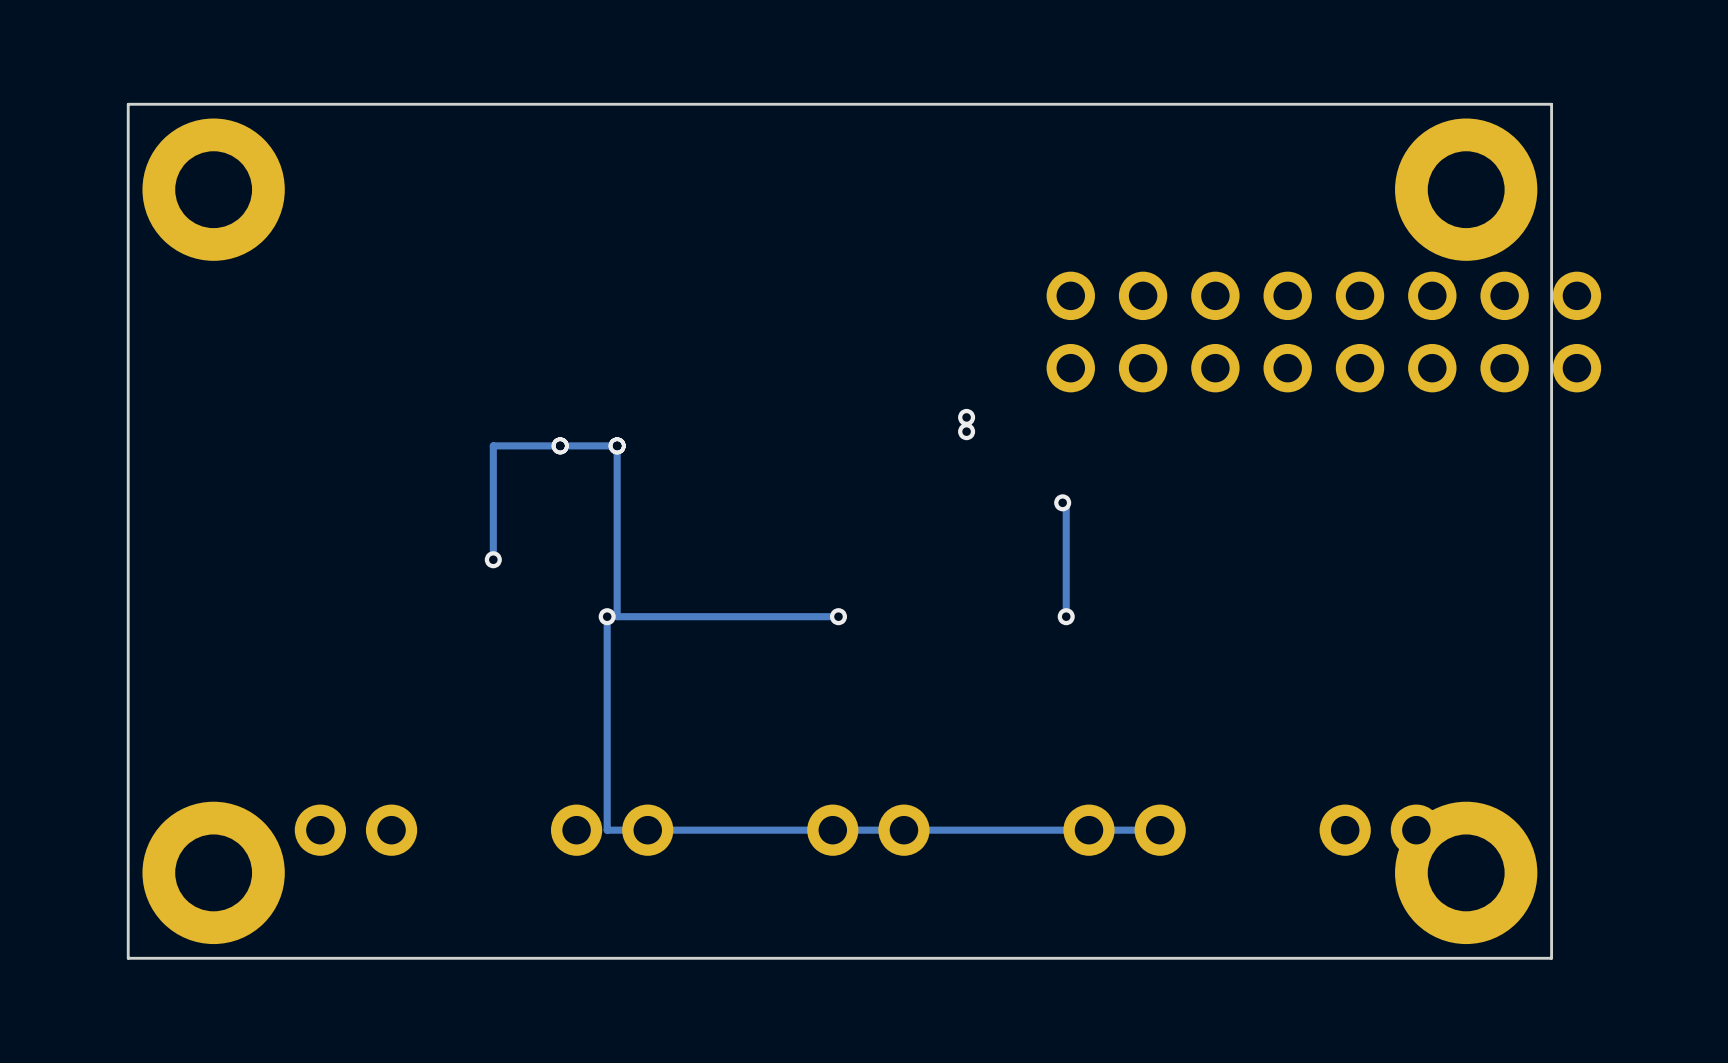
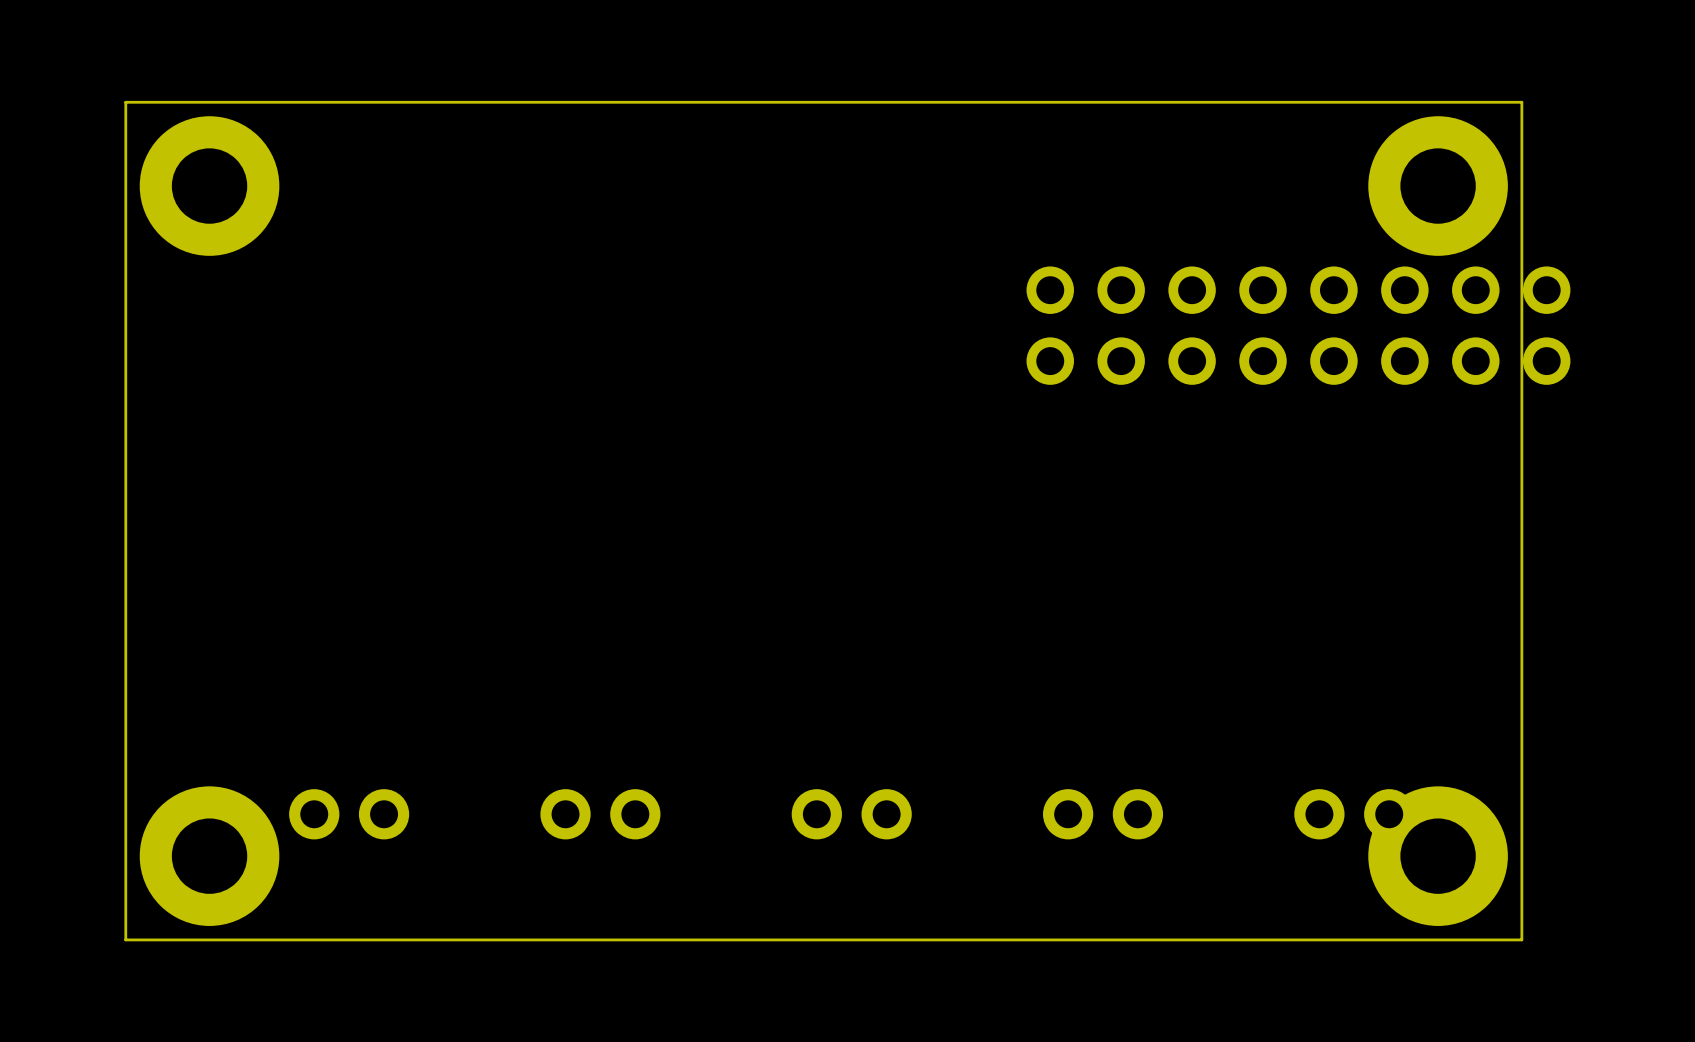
via: (966, 417) -> none
via: (966, 431) -> none
via: (560, 445) -> none
via: (617, 445) -> none
track: (1062, 502) (1066, 502) (1066, 616) -> none
via: (1062, 502) -> none
track: (493, 559) (493, 445) (617, 445) (617, 616) (838, 616) -> none
via: (493, 559) -> none
track: (607, 616) (607, 830) (1160, 830) -> none
via: (607, 616) -> none
via: (838, 616) -> none
via: (1066, 616) -> none

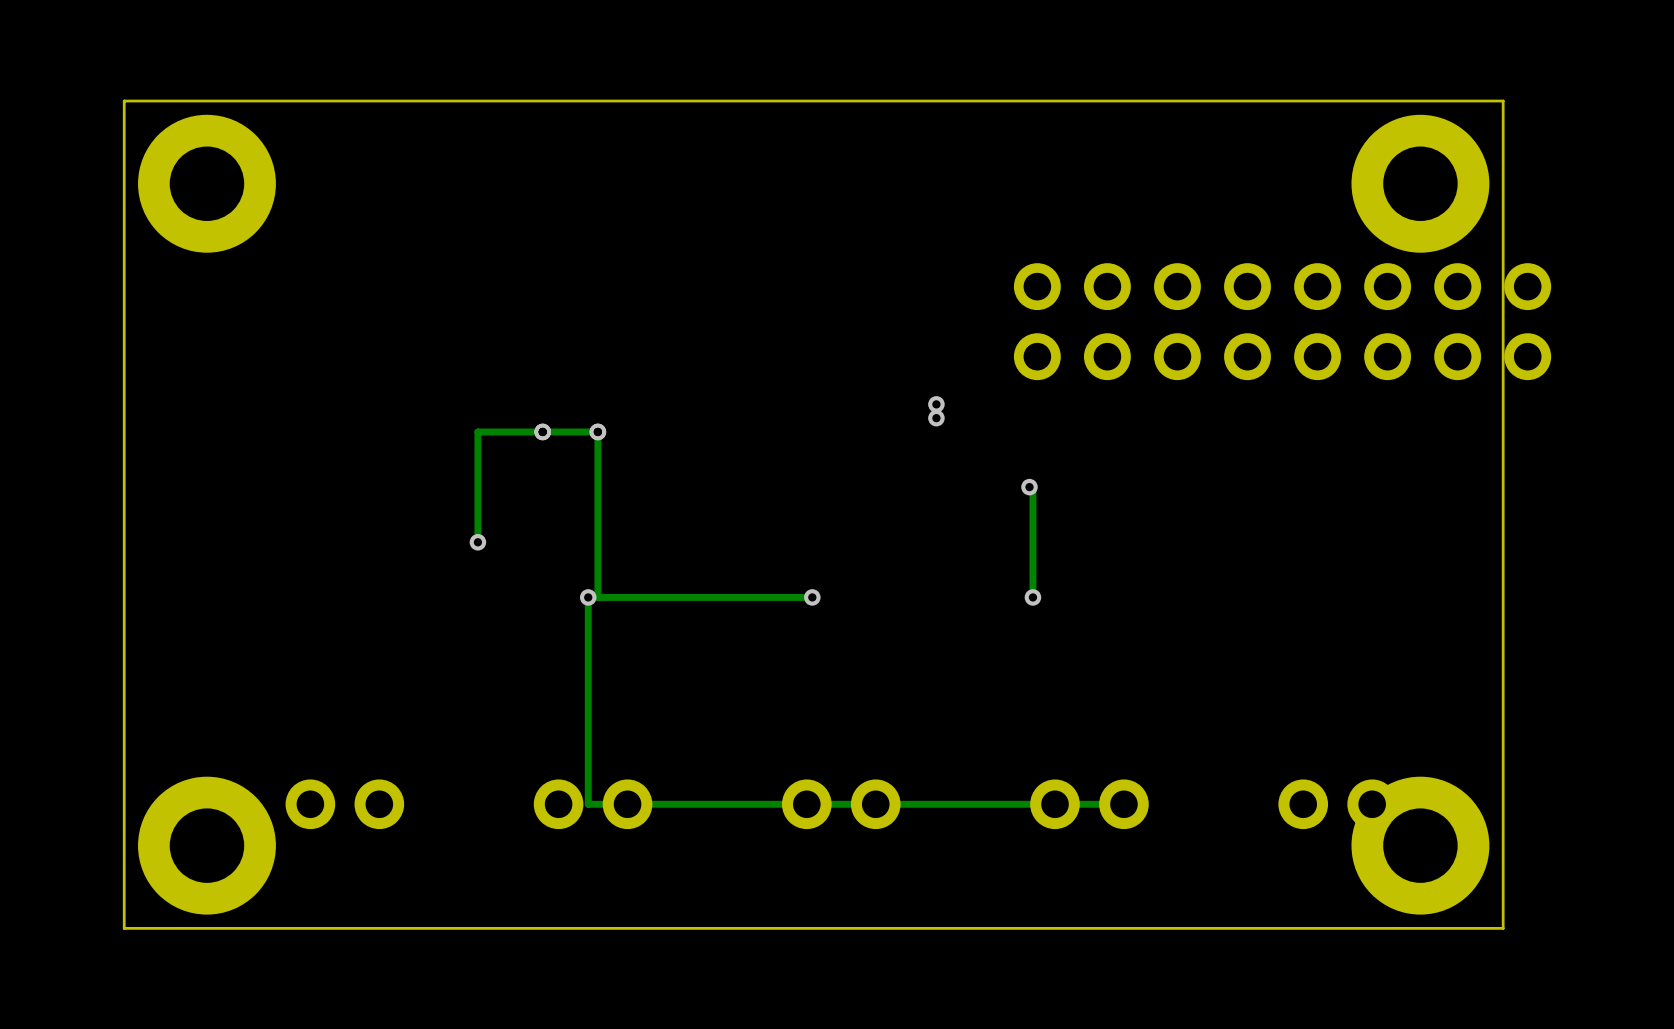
via: none -> (936, 404)
via: none -> (936, 418)
via: none -> (542, 431)
via: none -> (597, 431)
track: none -> (1029, 487) (1032, 487) (1032, 597)
via: none -> (1029, 487)
track: none -> (477, 542) (477, 431) (597, 431) (597, 597) (812, 597)
via: none -> (477, 542)
track: none -> (588, 597) (588, 804) (1123, 804)
via: none -> (588, 597)
via: none -> (812, 597)
via: none -> (1032, 597)

